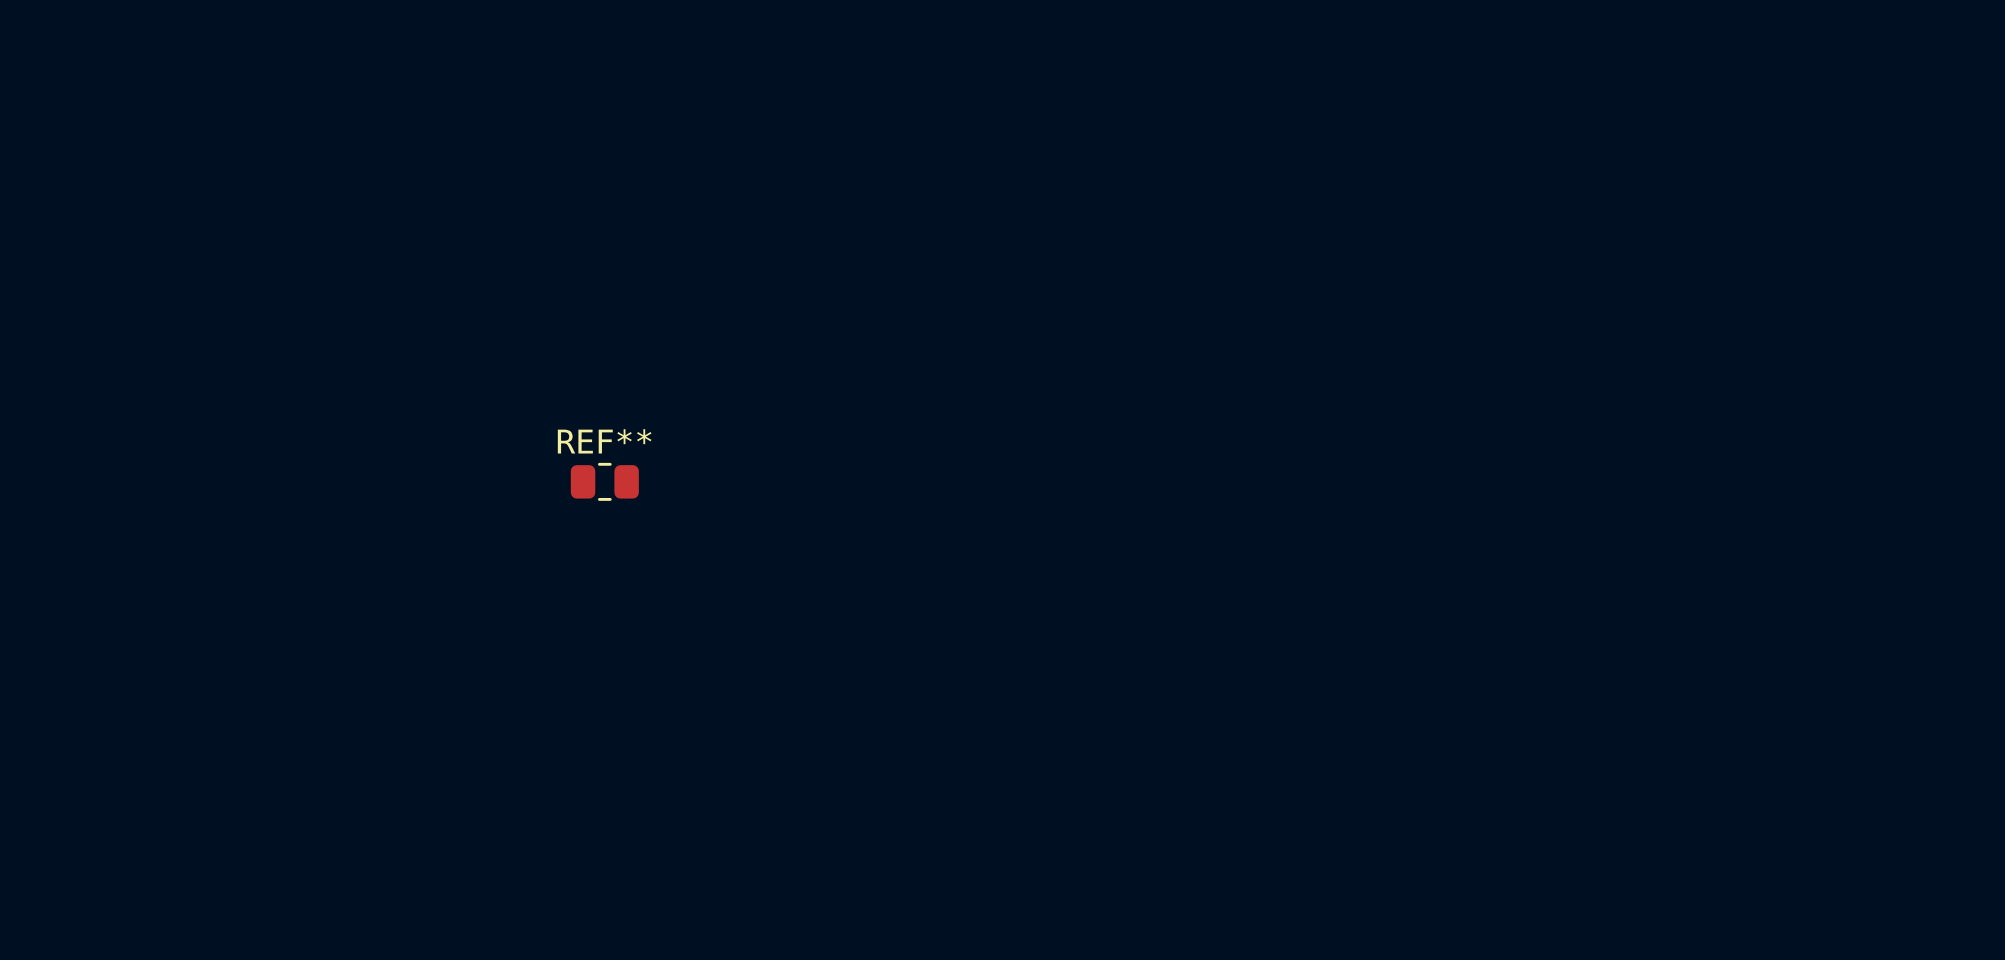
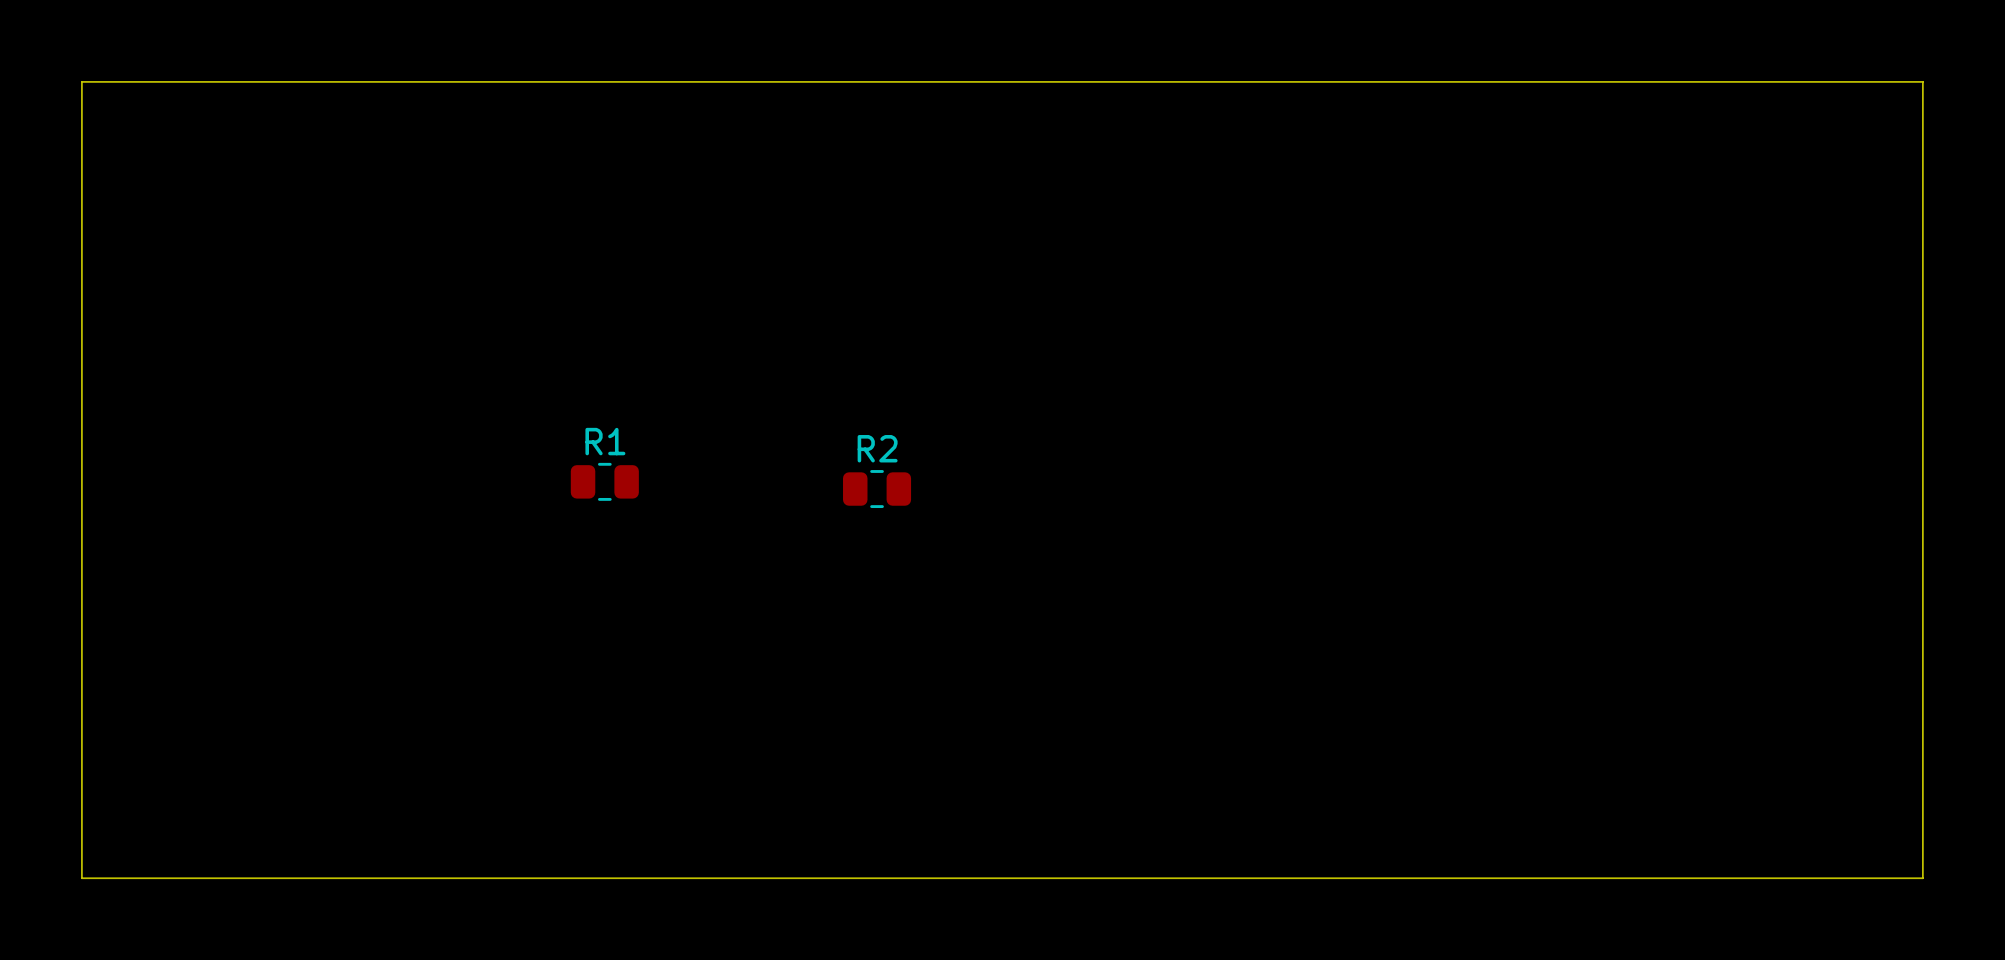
board edge: none -> (81, 81) (1922, 81) (1922, 878) (81, 878) (81, 81)
REF** name: REF** (604, 441) -> R1 (605, 441)
R2: none -> (877, 489)

